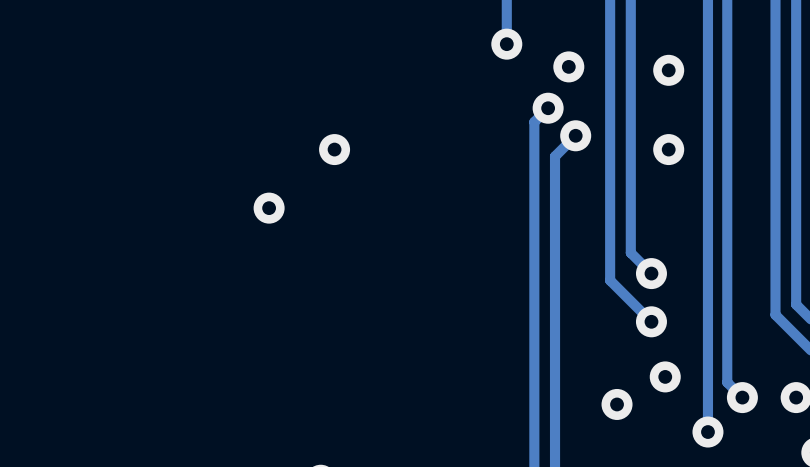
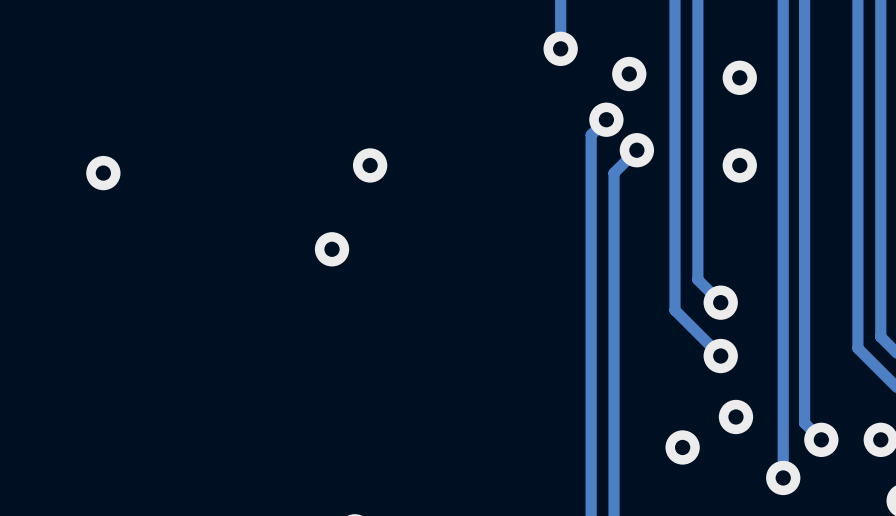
via: none -> (103, 173)
via position: (269, 208) -> (332, 249)

